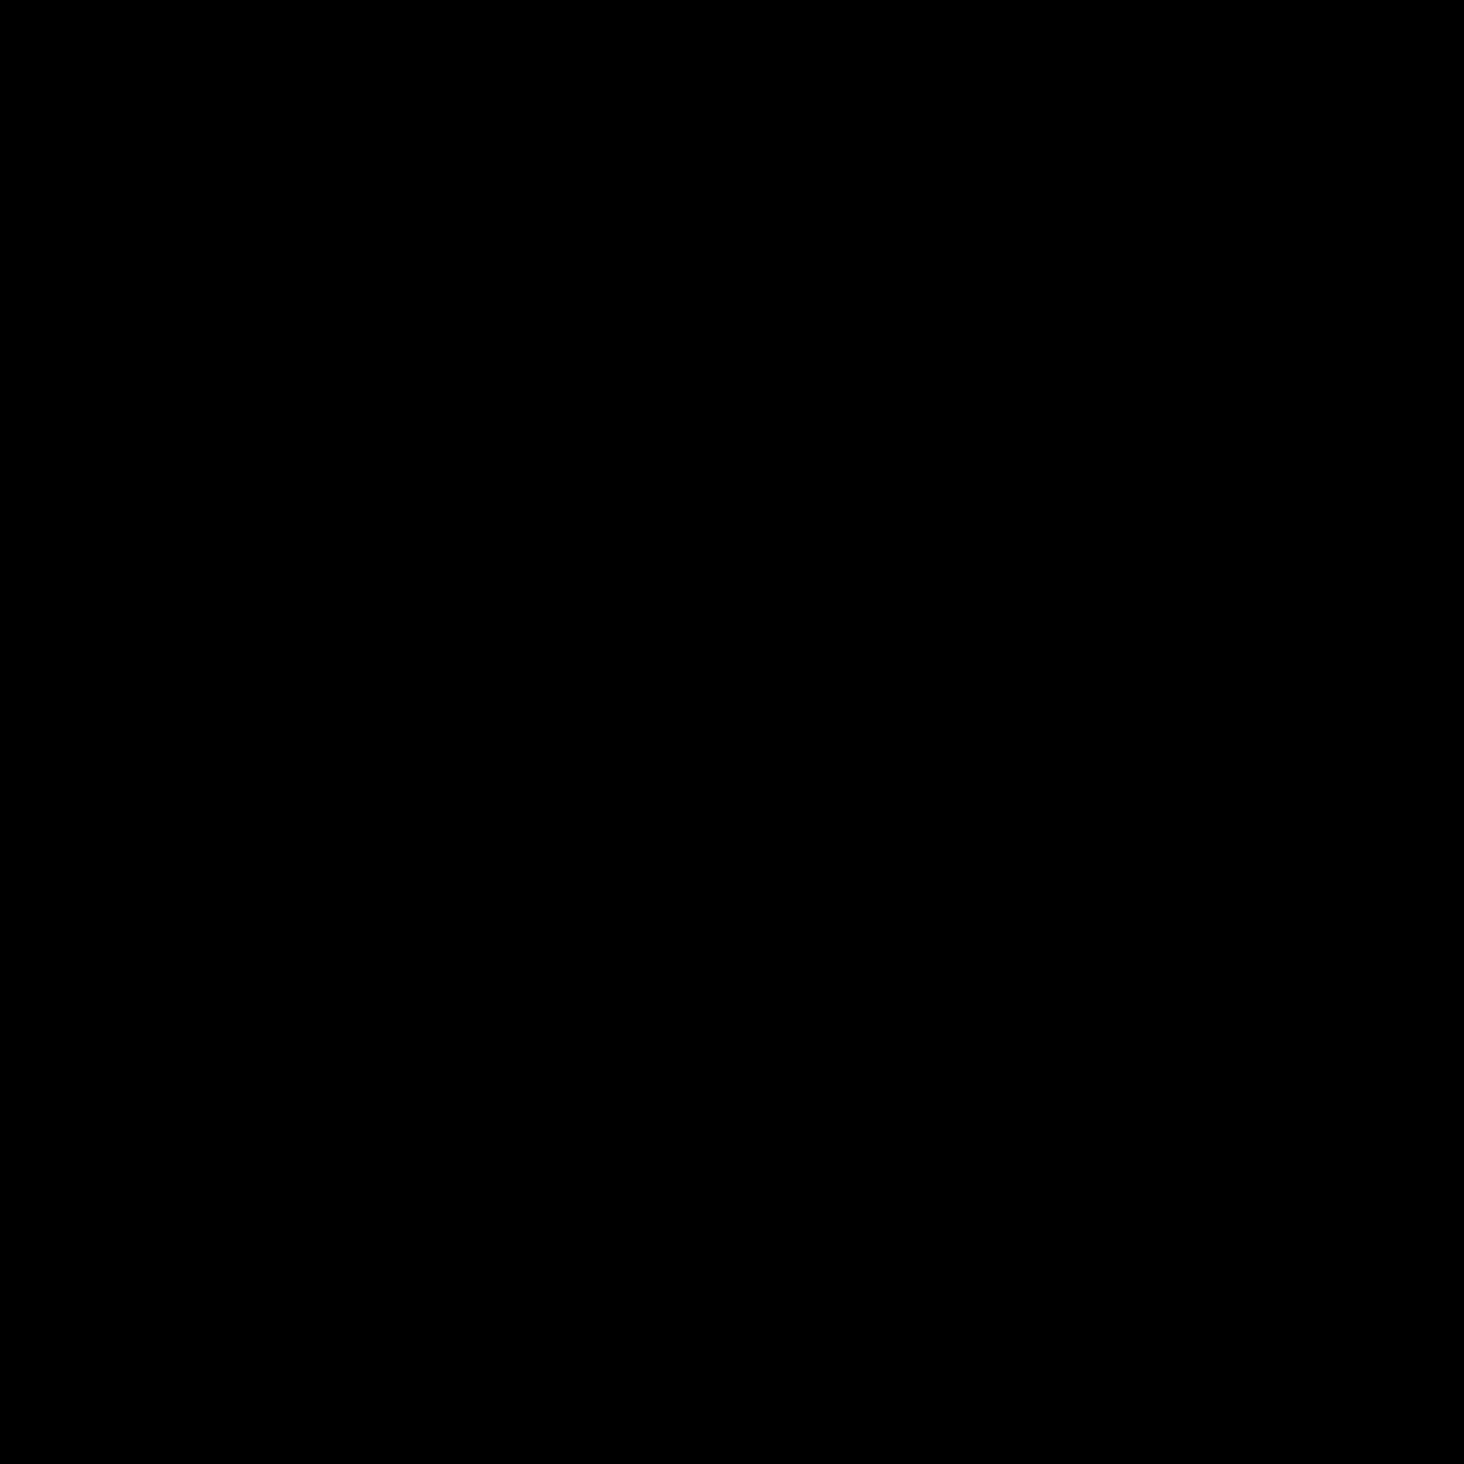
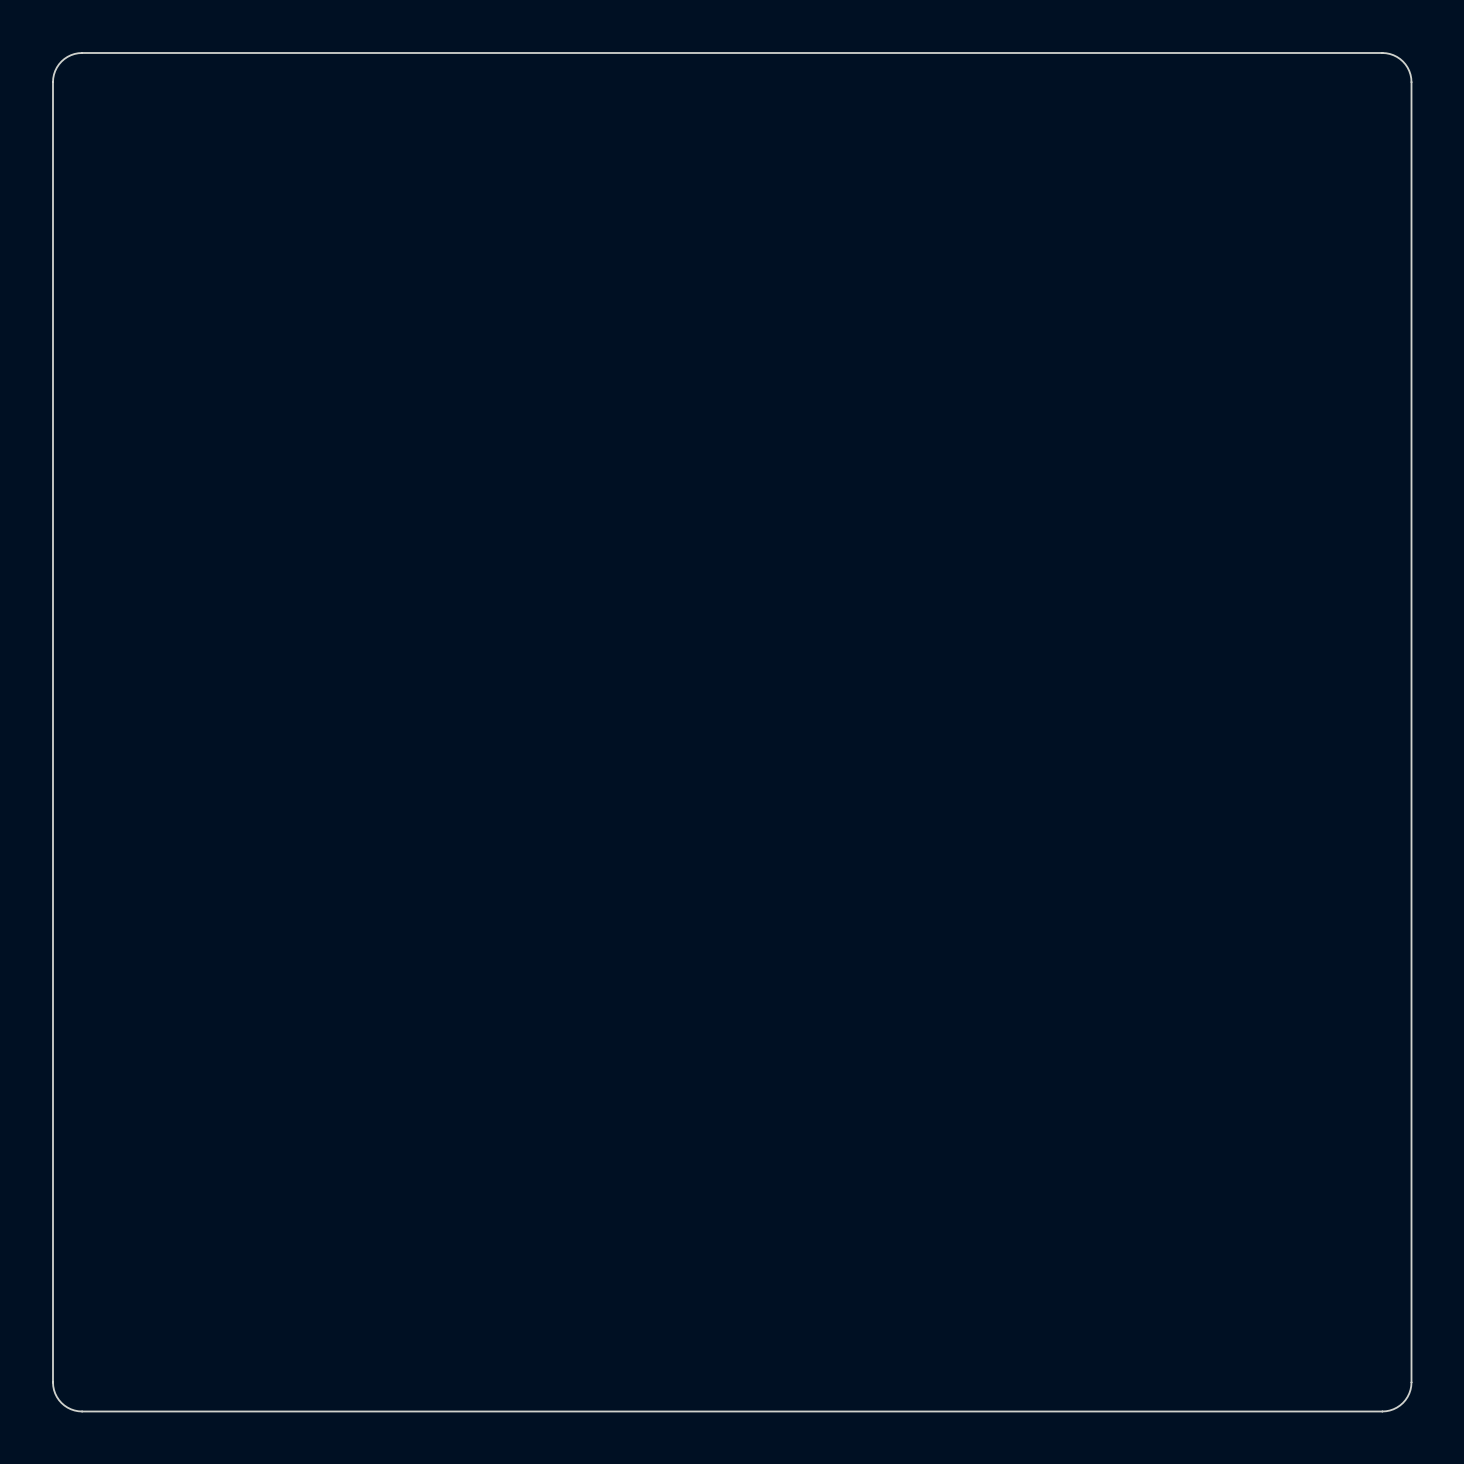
board edge: none -> (1382, 52) (82, 52) (70, 55) (61, 61) (55, 70) (52, 82) (52, 1382) (55, 1393) (61, 1402) (70, 1409) (82, 1411) (1382, 1411) (1393, 1409) (1402, 1402) (1409, 1393) (1411, 1382) (1411, 82) (1409, 70) (1402, 61) (1393, 55) (1382, 52)

